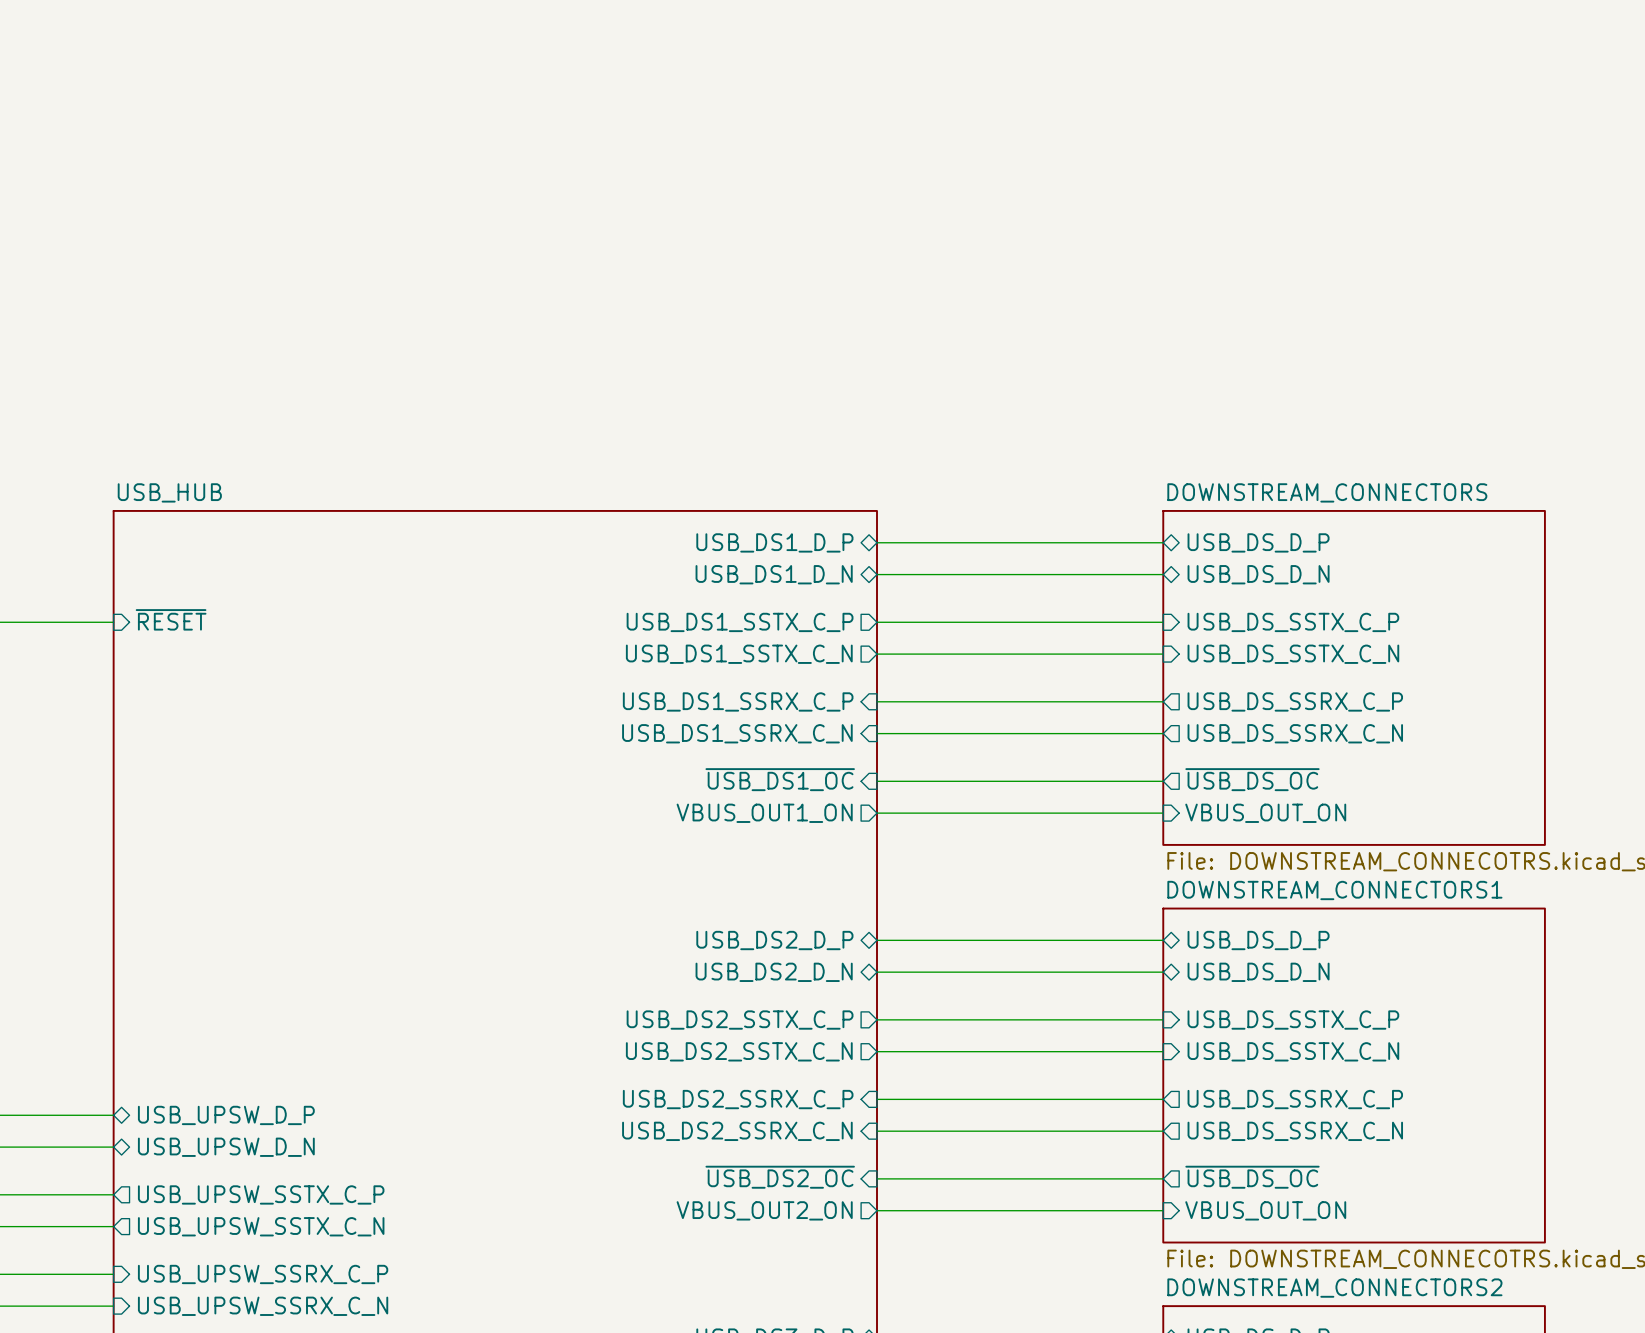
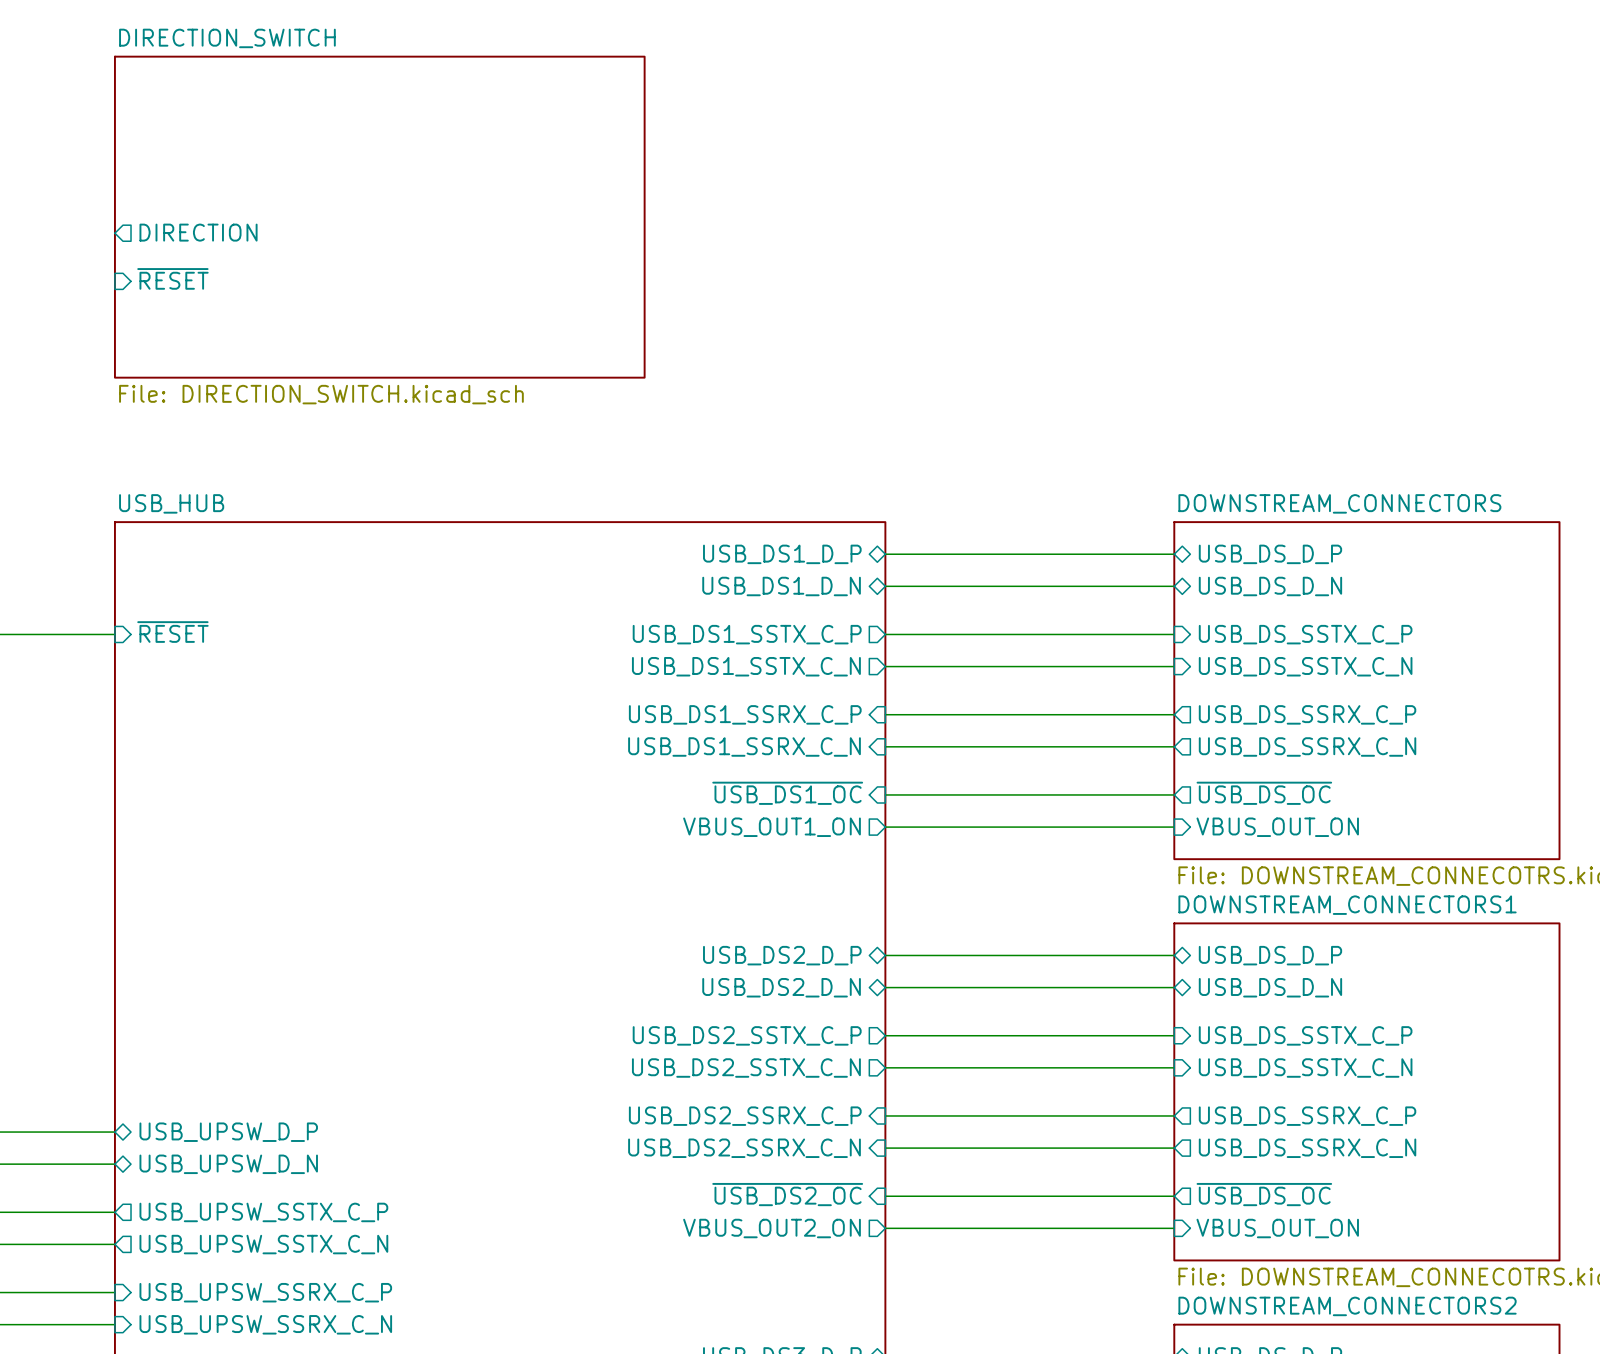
sheet DIRECTION_SWITCH: none -> File: DIRECTION_SWITCH.kicad_sch (379, 217)
sheet pin: none -> DIRECTION (198, 232)
sheet pin: none -> ~{RESET} (172, 278)

